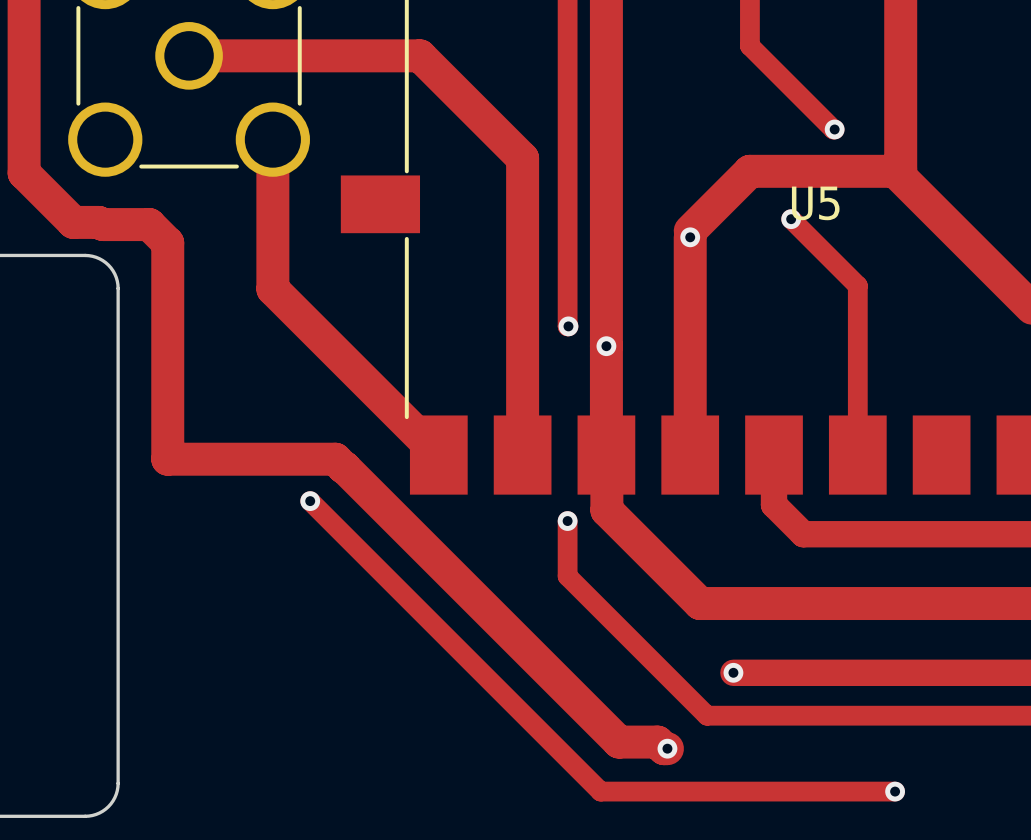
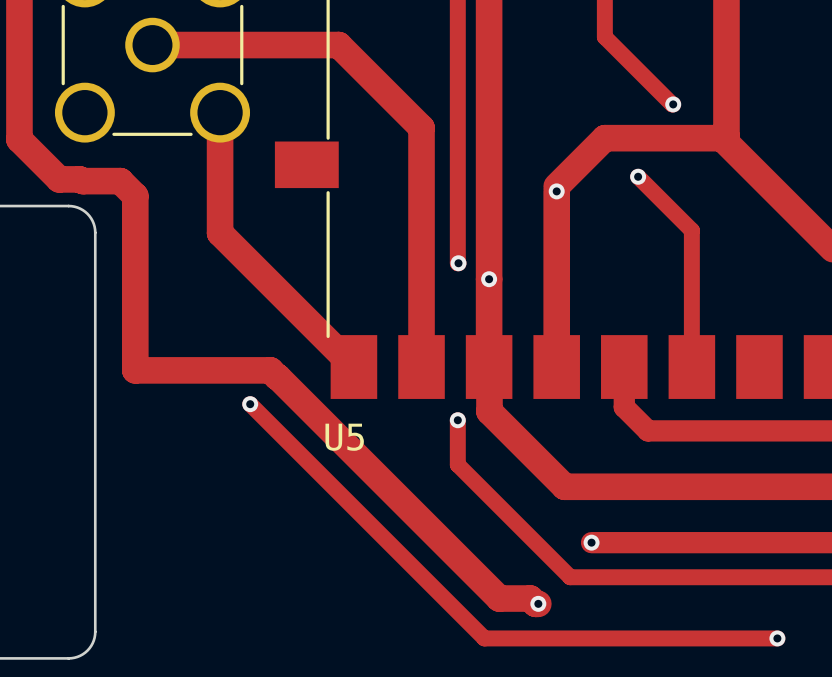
U5 name position: U5 (815, 203) -> U5 (344, 437)
track: none -> (721, 638) (777, 638)
via position: (895, 791) -> (777, 638)

